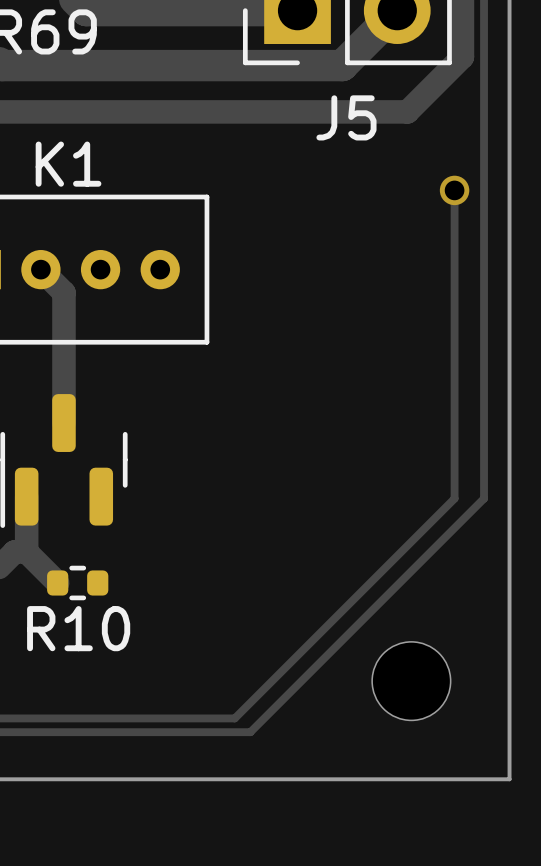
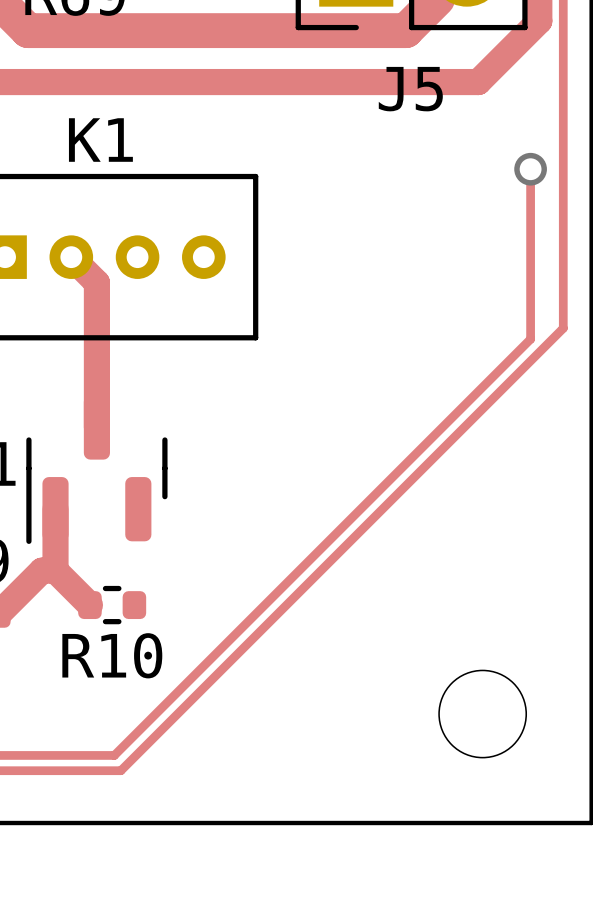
track: (484, 333) (484, 498) (250, 732) (85, 732) -> (563, 328) (120, 770)
track: (454, 343) (454, 498) (234, 718) (79, 718) -> (530, 339) (114, 755)

